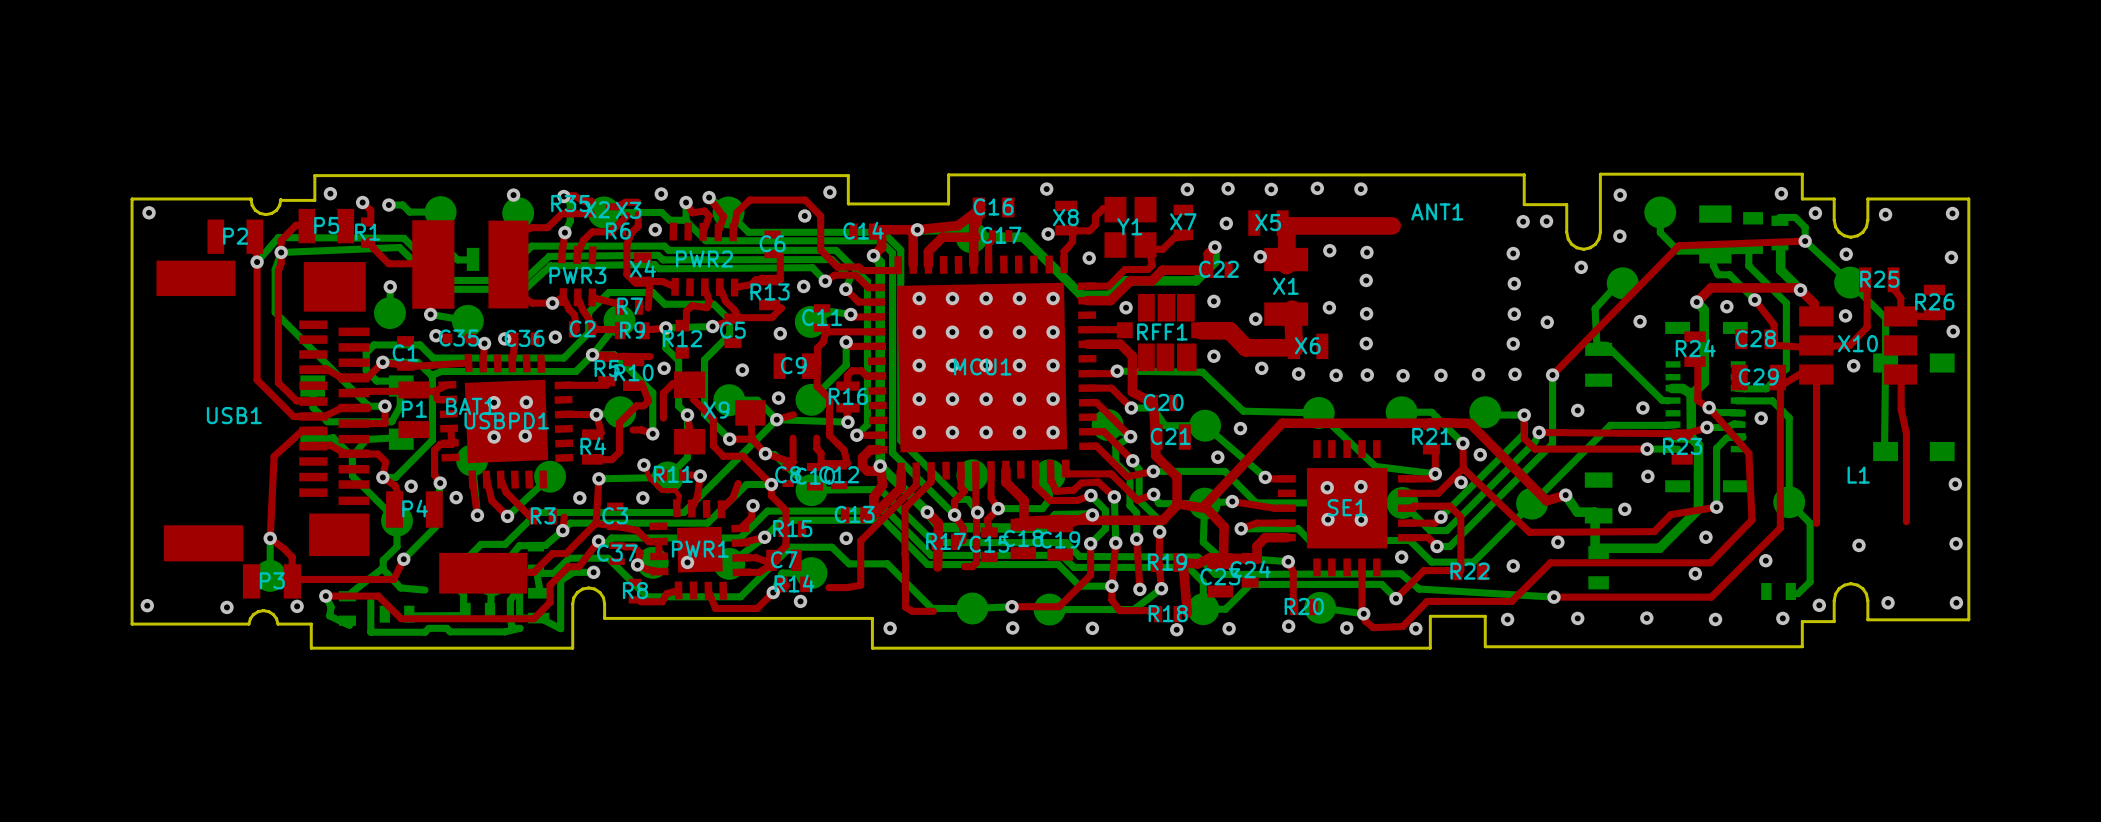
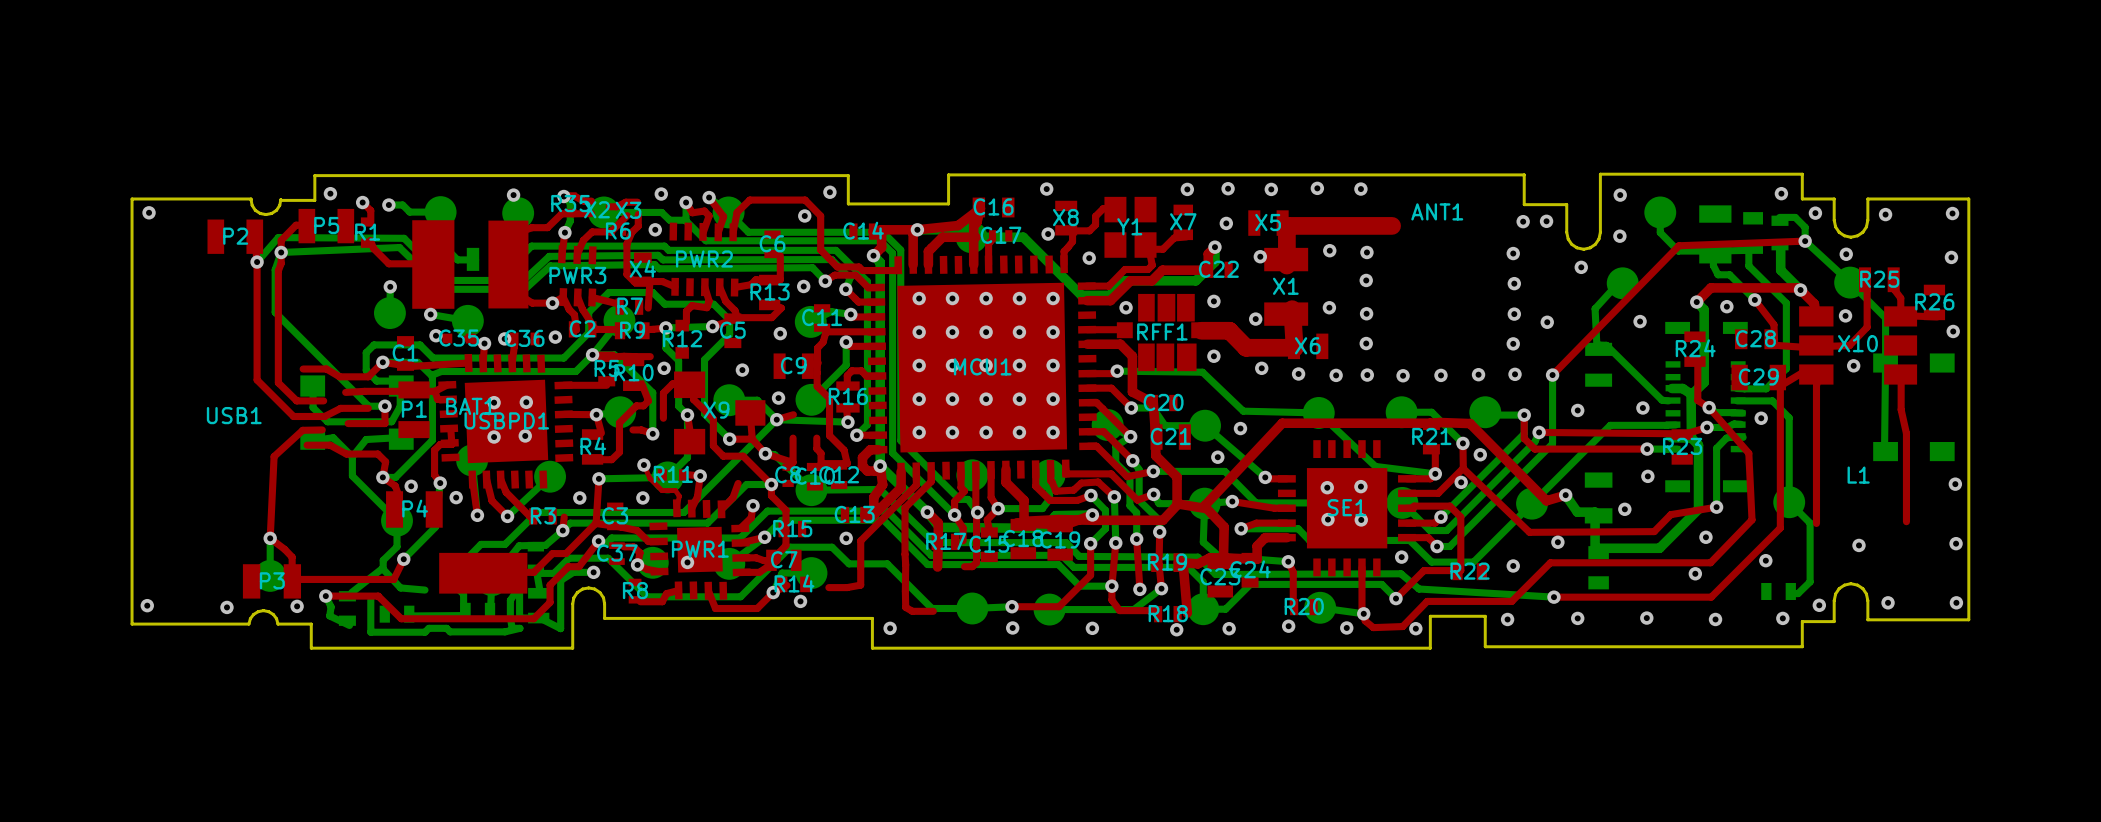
USB1 footprint: [156, 260, 370, 562] -> [206, 406, 262, 425]
top track: (658, 541) (659, 556) -> none

